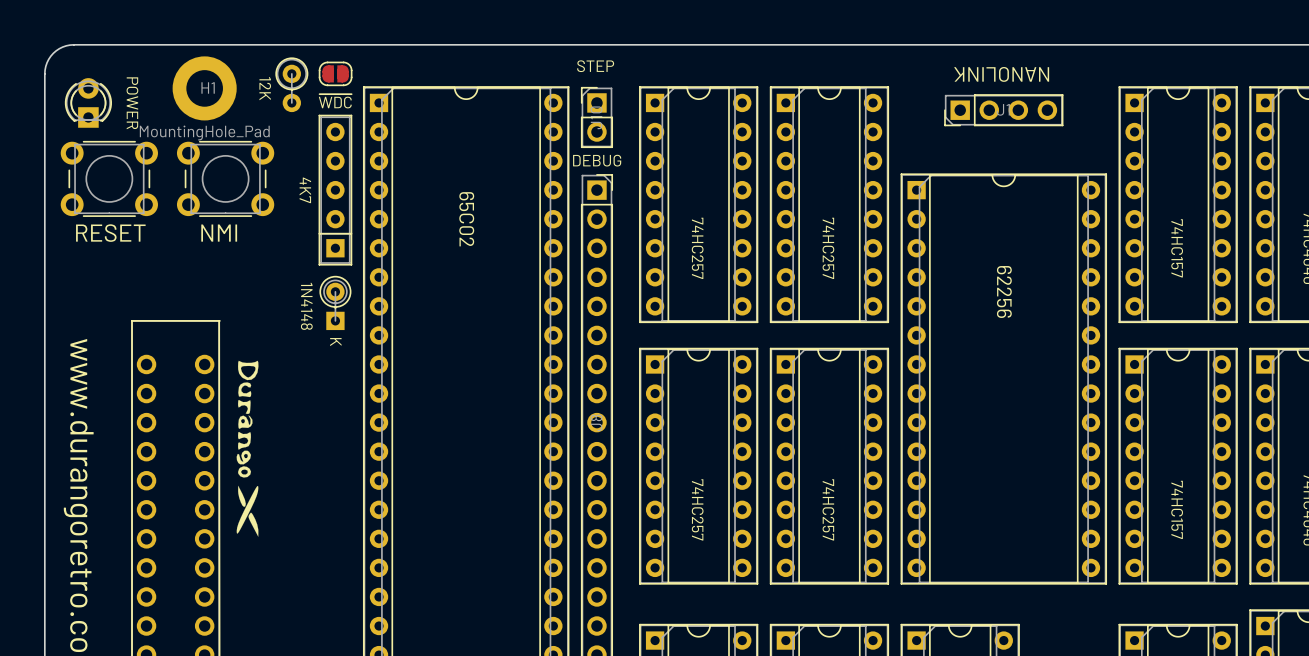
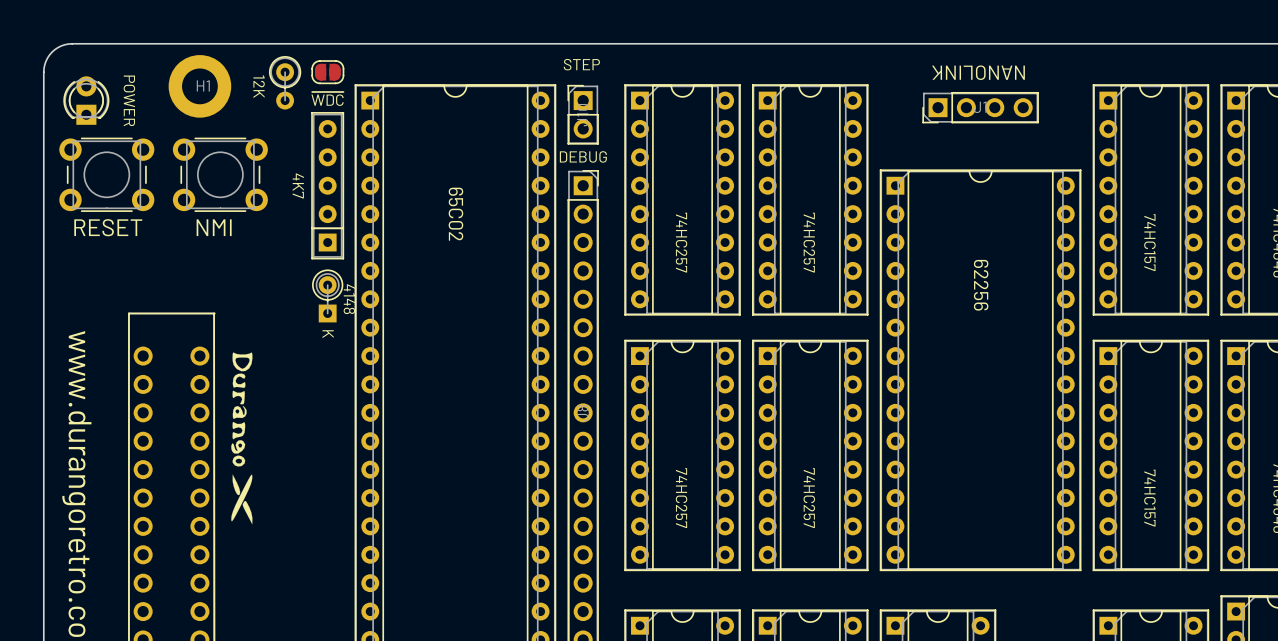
H1 value: MountingHole_Pad (204, 133) -> none
part value: 1N4148 (306, 306) -> 4148 (349, 299)

